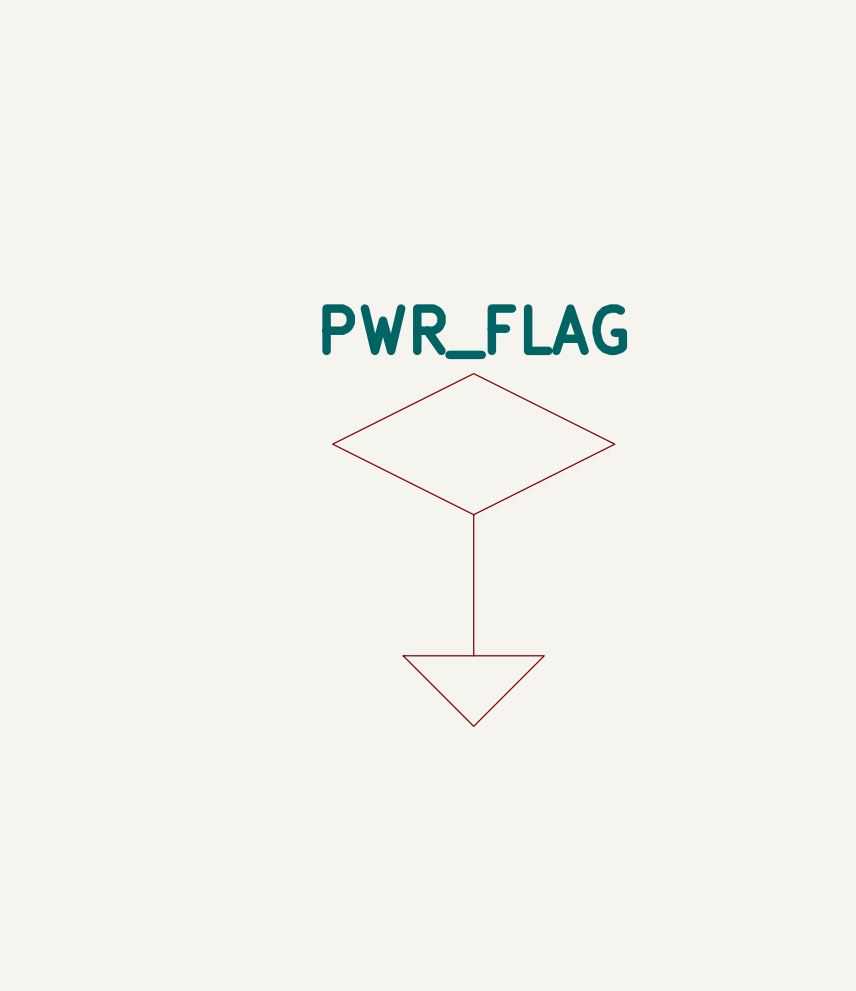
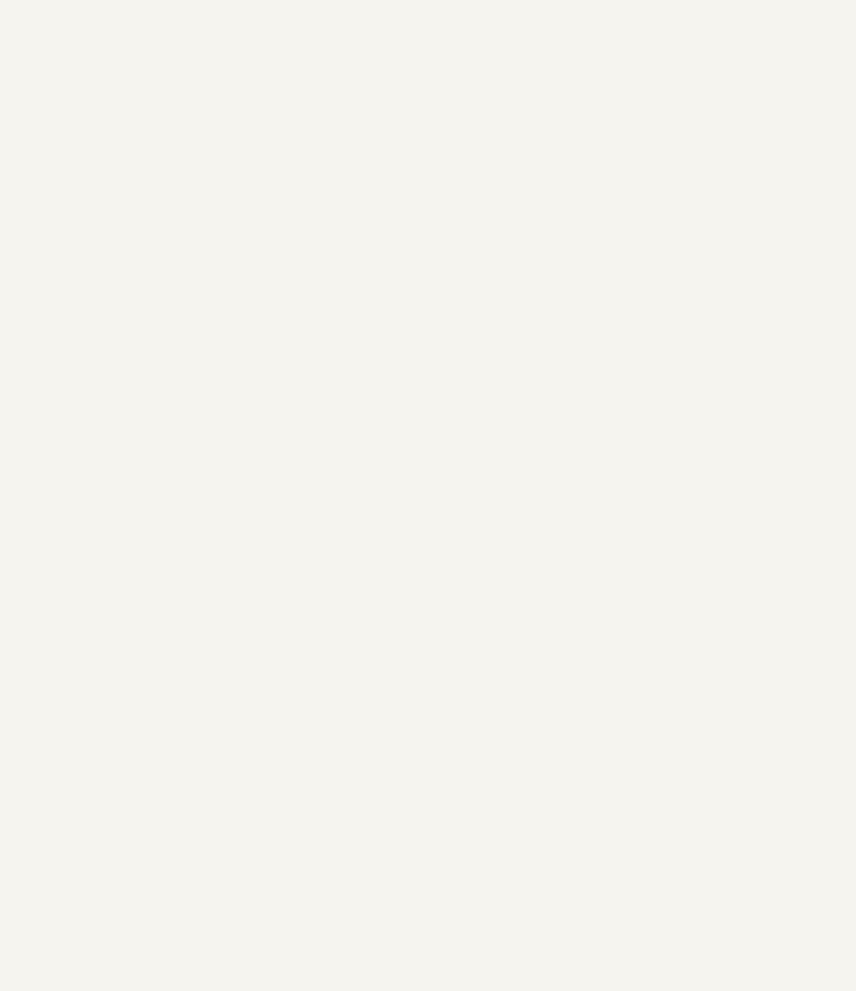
power symbol: PWR_FLAG (473, 514) -> none
power symbol: (473, 691) -> none

